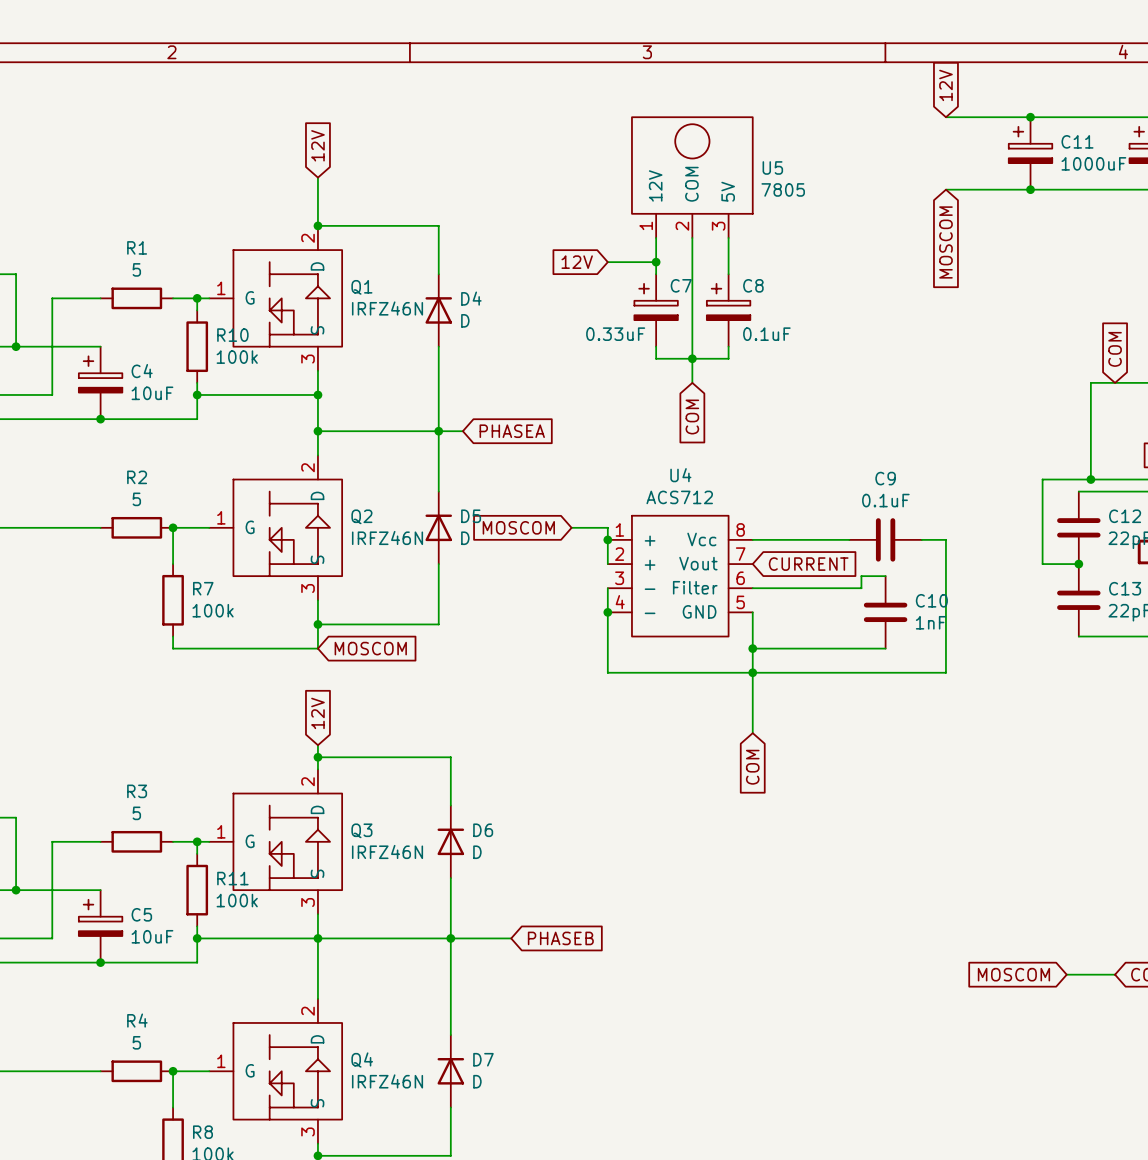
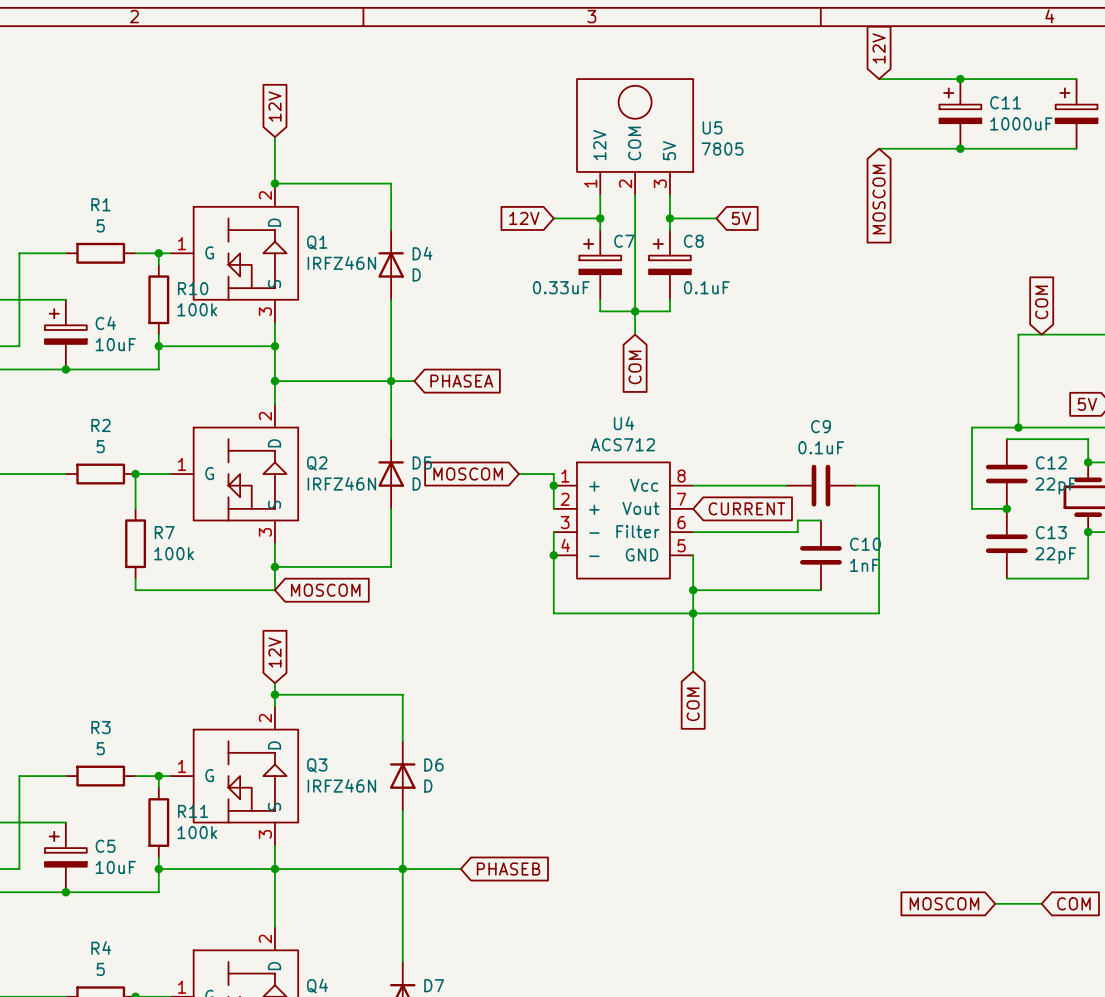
wire: none -> (669, 218) (716, 218)
junction: none -> (669, 218)
global label: none -> 5V (741, 218)

